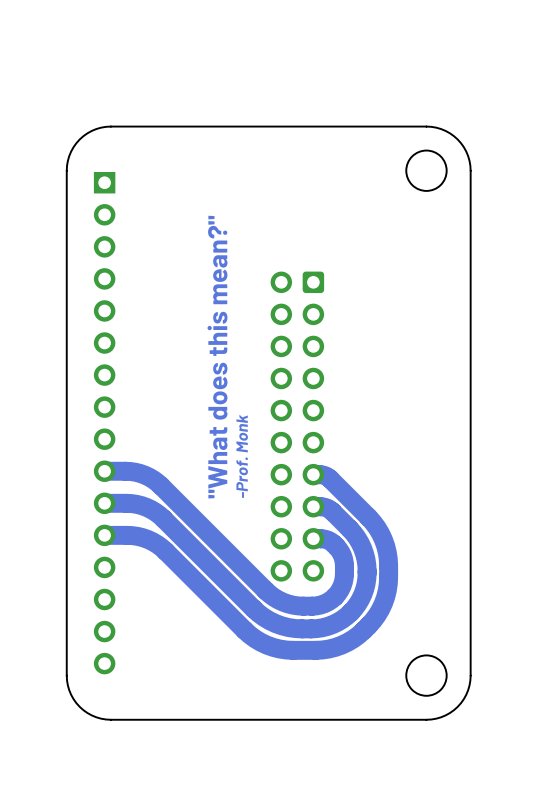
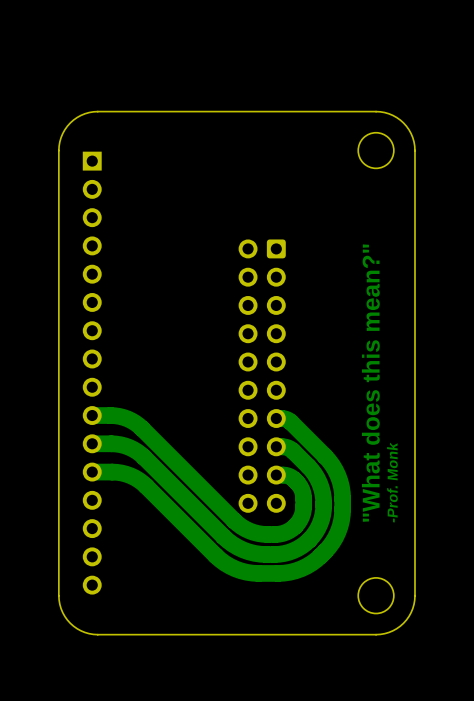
text position: "What does this mean?" (217, 357) -> "What does this mean?" (370, 383)
text position: -Prof. Monk (242, 456) -> -Prof. Monk (392, 482)

